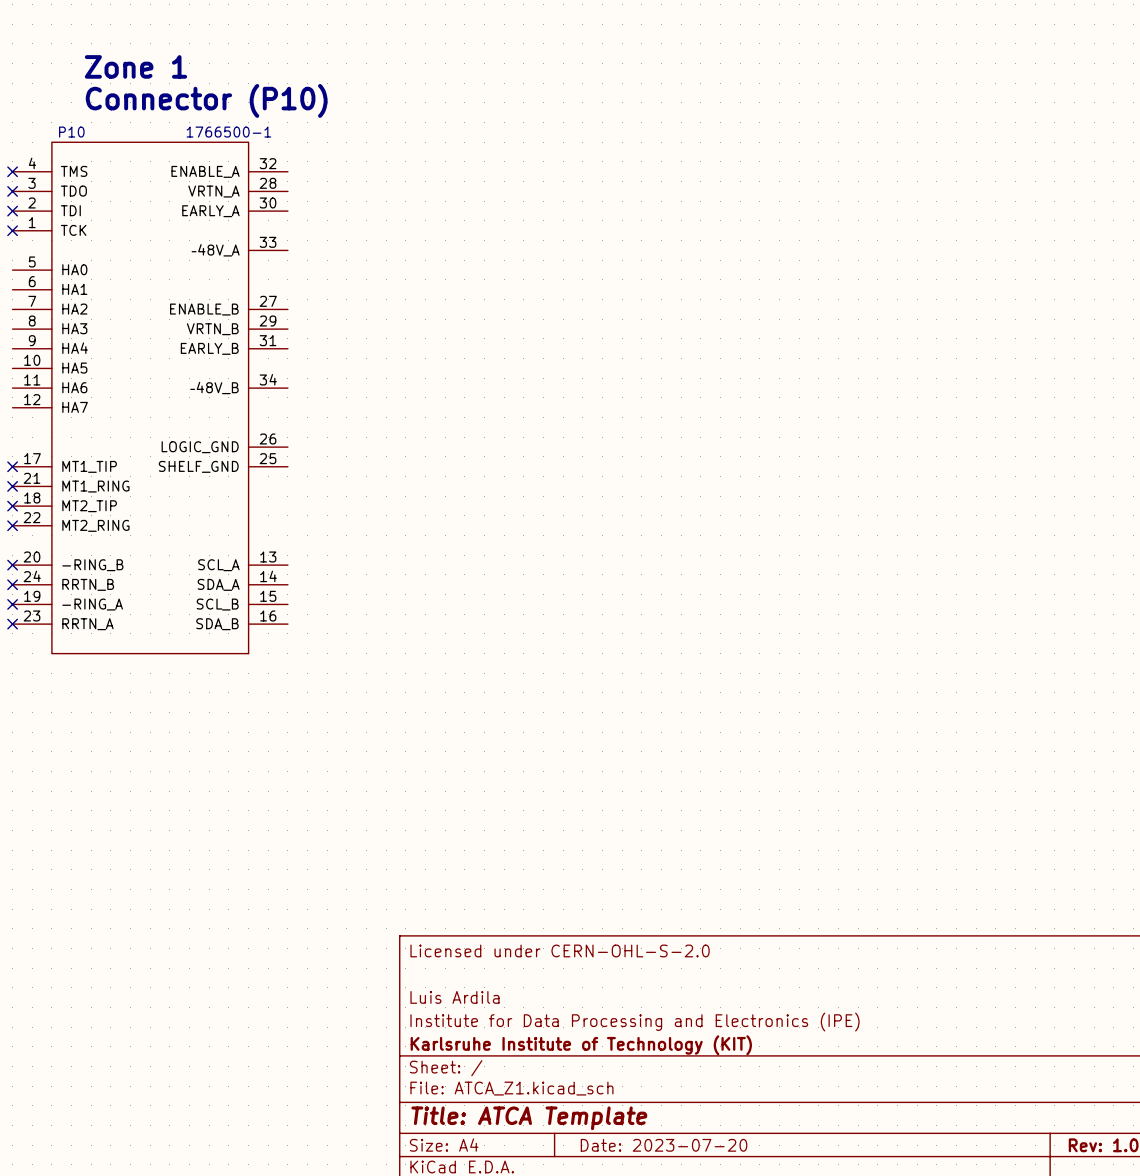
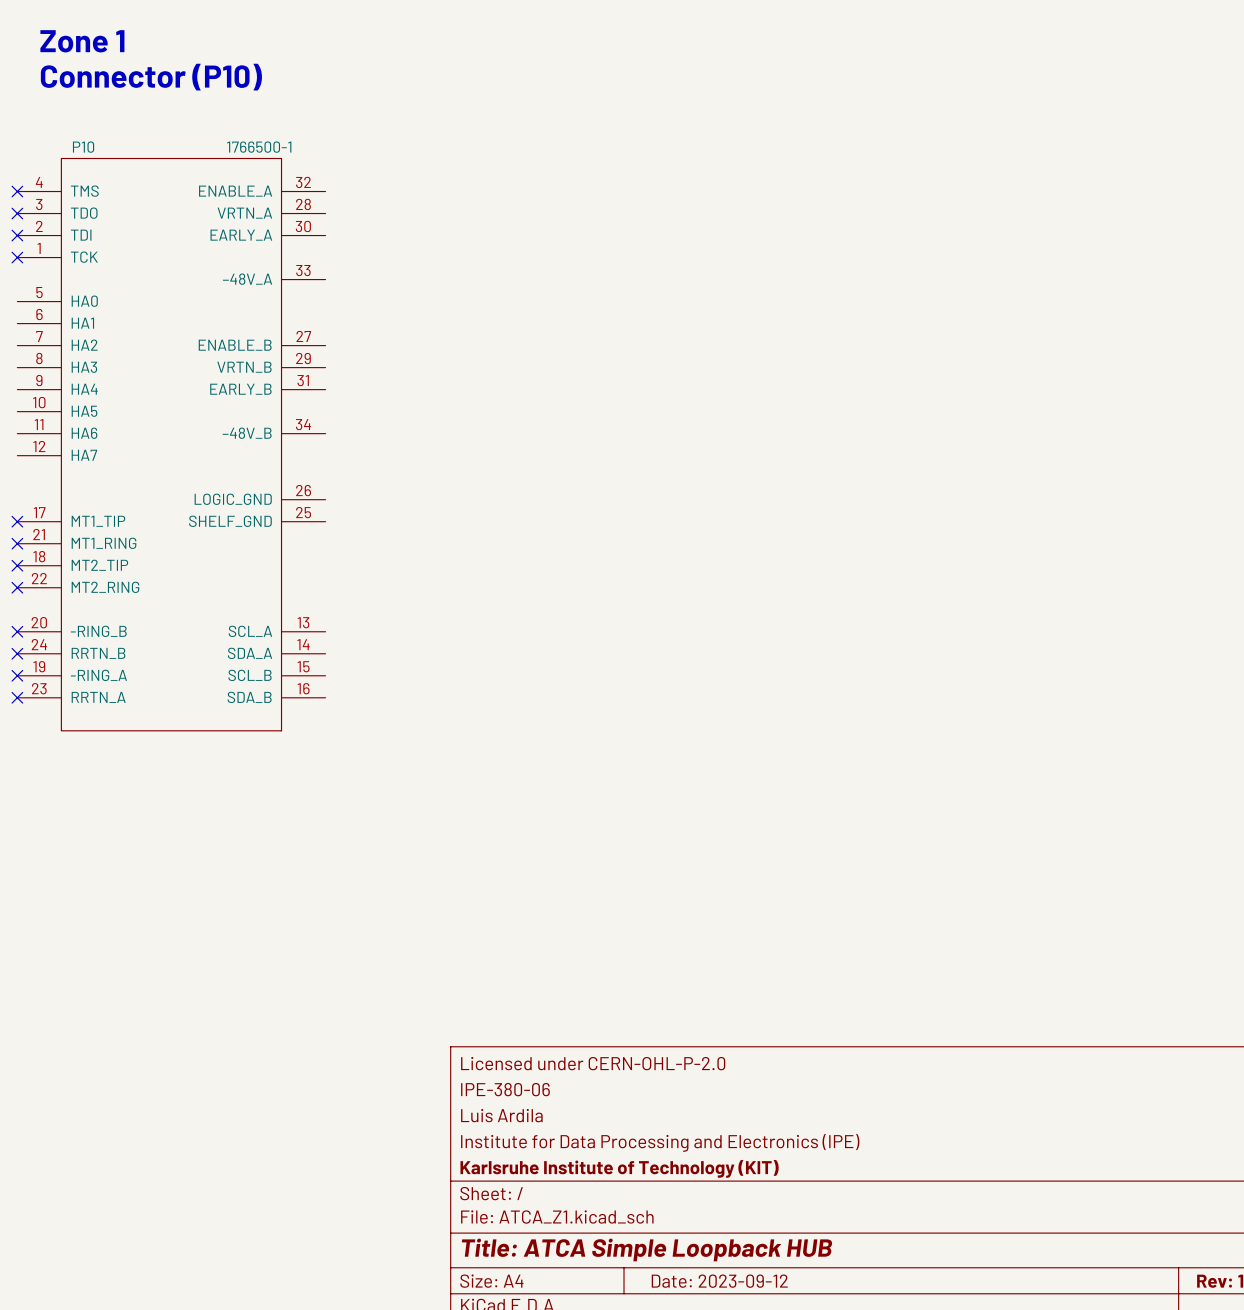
text position: Zone 1 (135, 66) -> Zone 1 (82, 41)
text position: Connector (P10) (206, 100) -> Connector (P10) (151, 77)
title block: Licensed under CERN-OHL-S-2.0 (560, 950) -> Licensed under CERN-OHL-P-2.0 (593, 1063)
title block: none -> IPE-380-06 (505, 1089)
title block: Title: ATCA Template (529, 1118) -> Title: ATCA Simple Loopback HUB (647, 1249)
title block: Date: 2023-07-20 (664, 1145) -> Date: 2023-09-12 (719, 1281)

